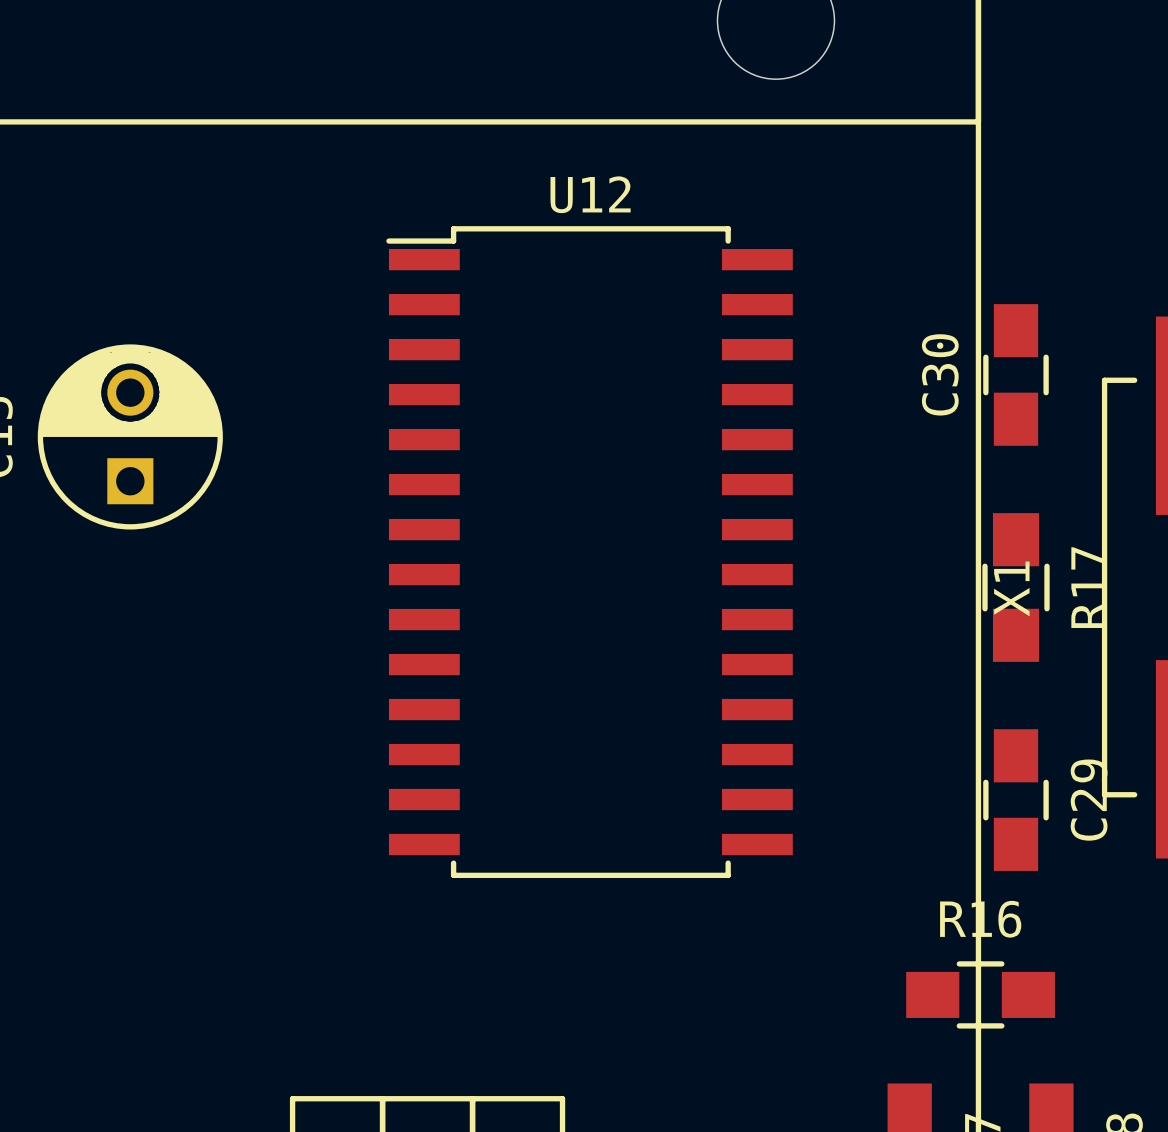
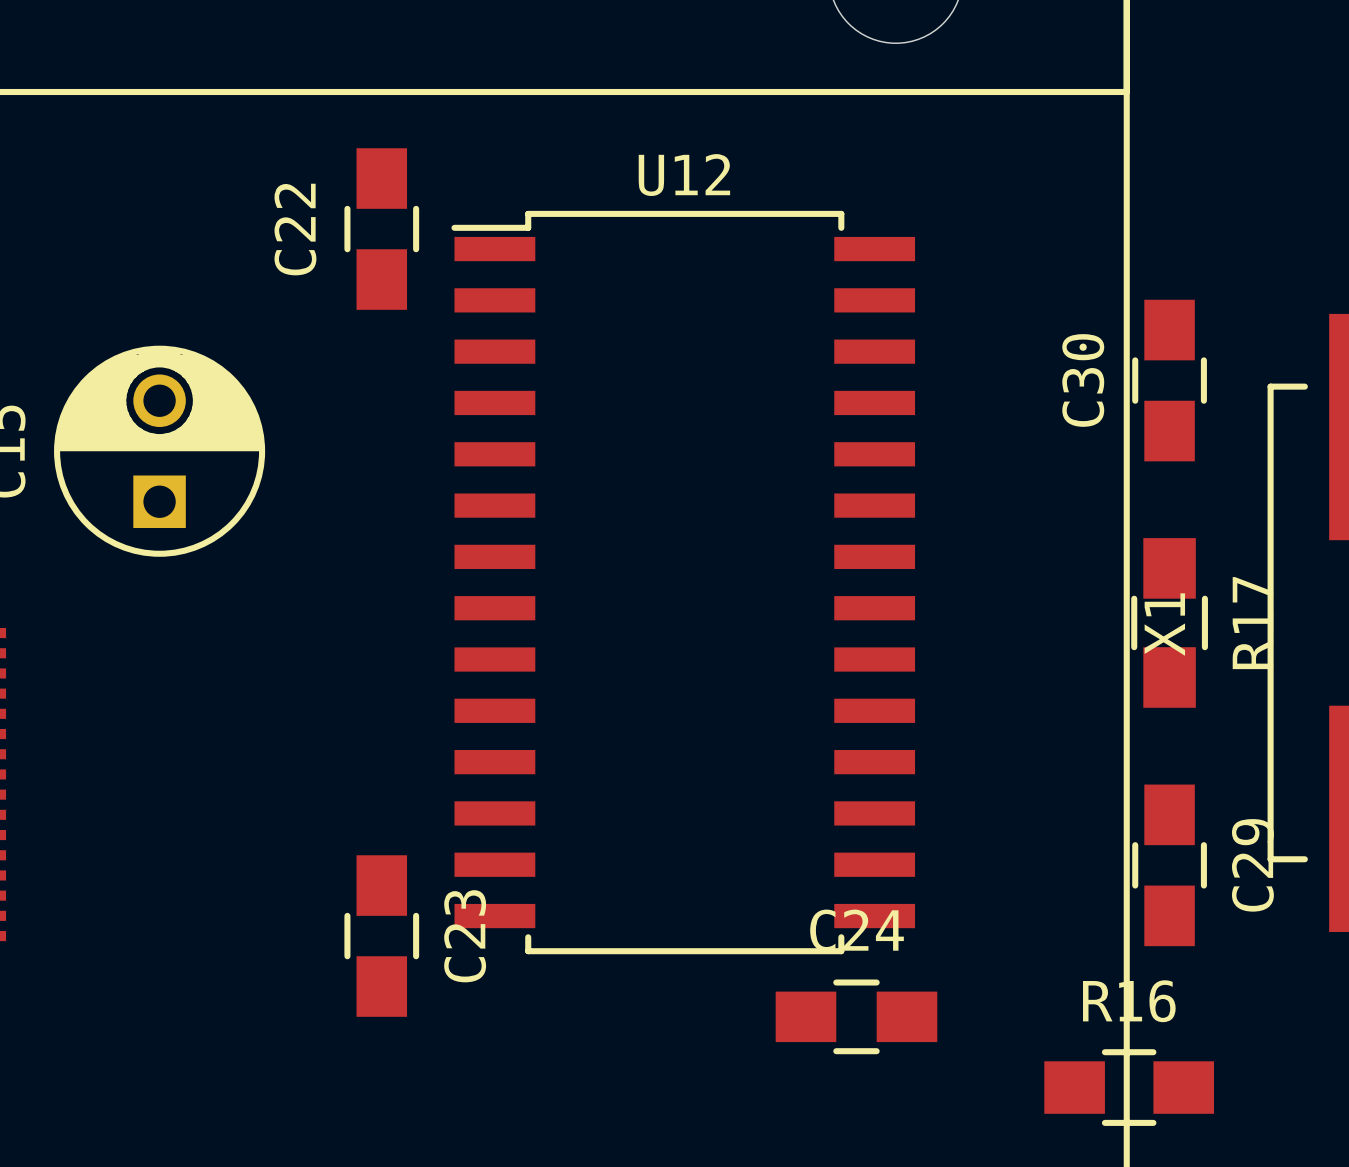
C22: none -> (381, 229)
C23: none -> (381, 936)
C24: none -> (856, 1016)

